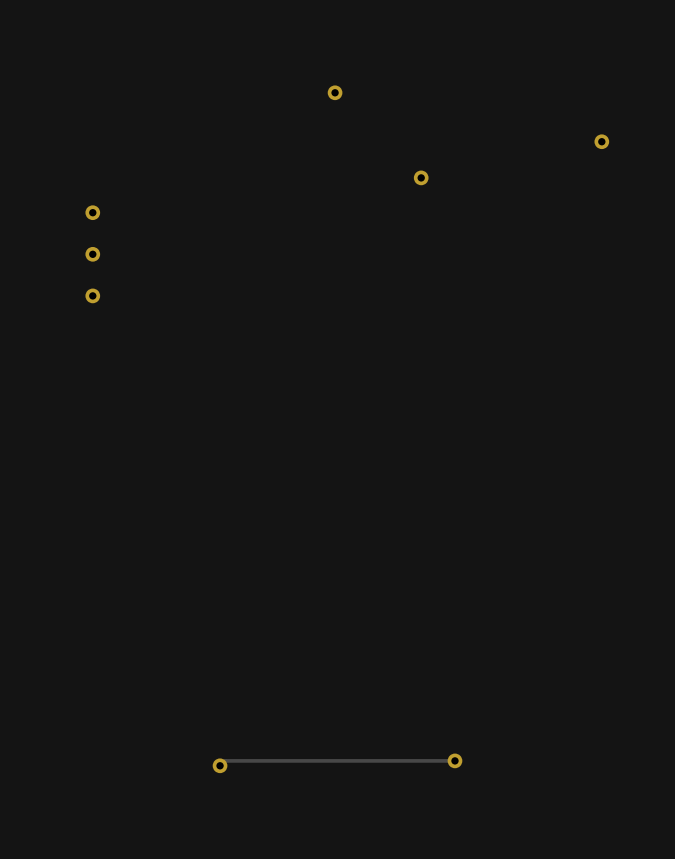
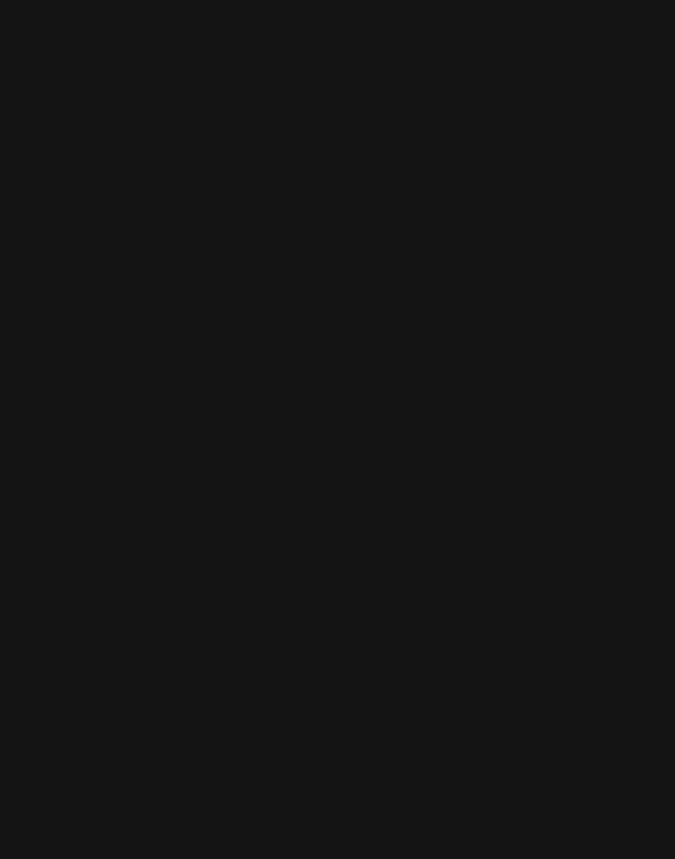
via: (335, 92) -> none
via: (601, 141) -> none
via: (421, 177) -> none
via: (92, 212) -> none
via: (92, 254) -> none
via: (92, 295) -> none
track: (454, 760) (224, 760) (220, 765) -> none
via: (454, 760) -> none
via: (220, 765) -> none

